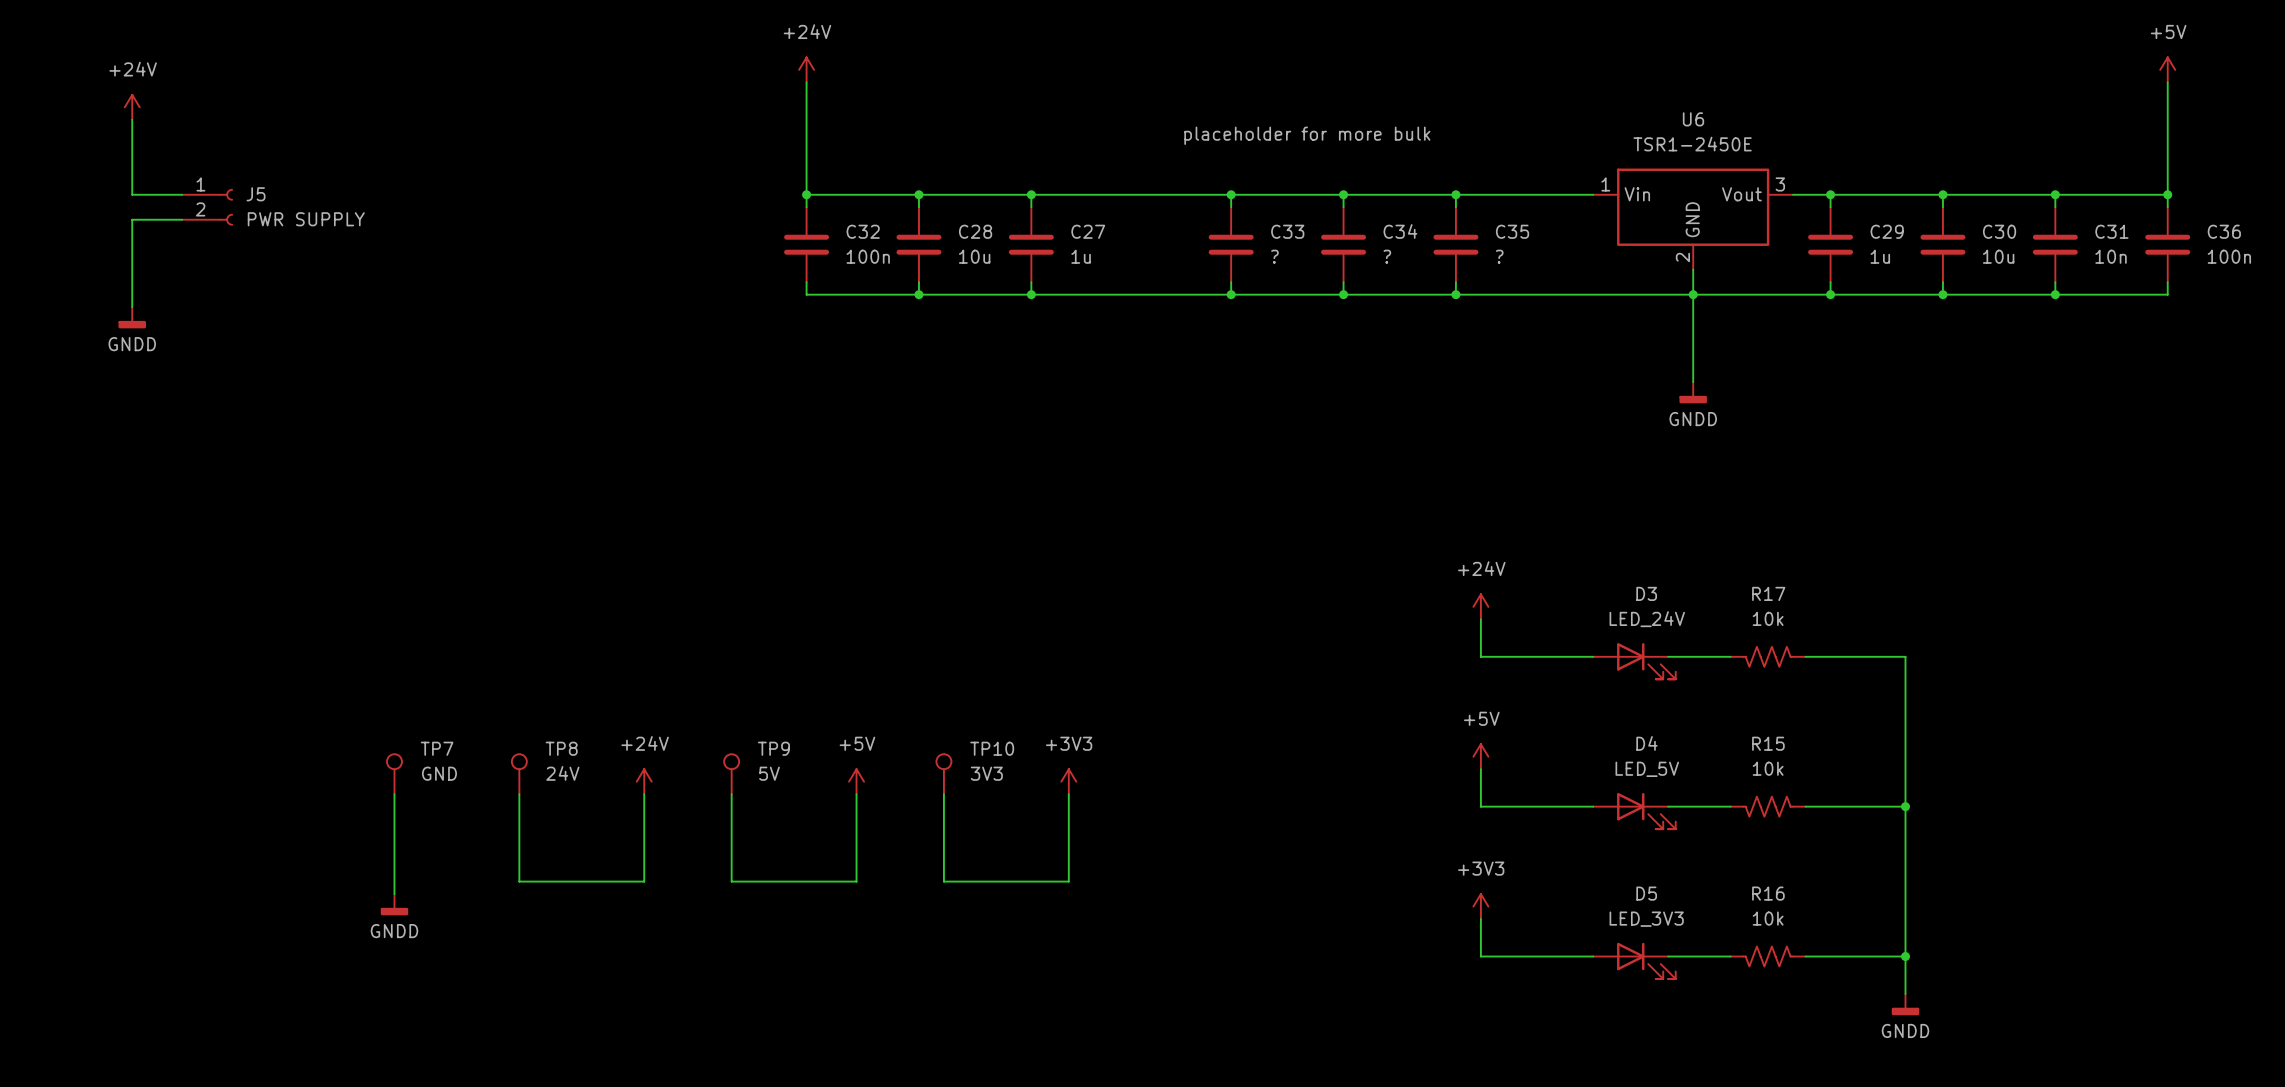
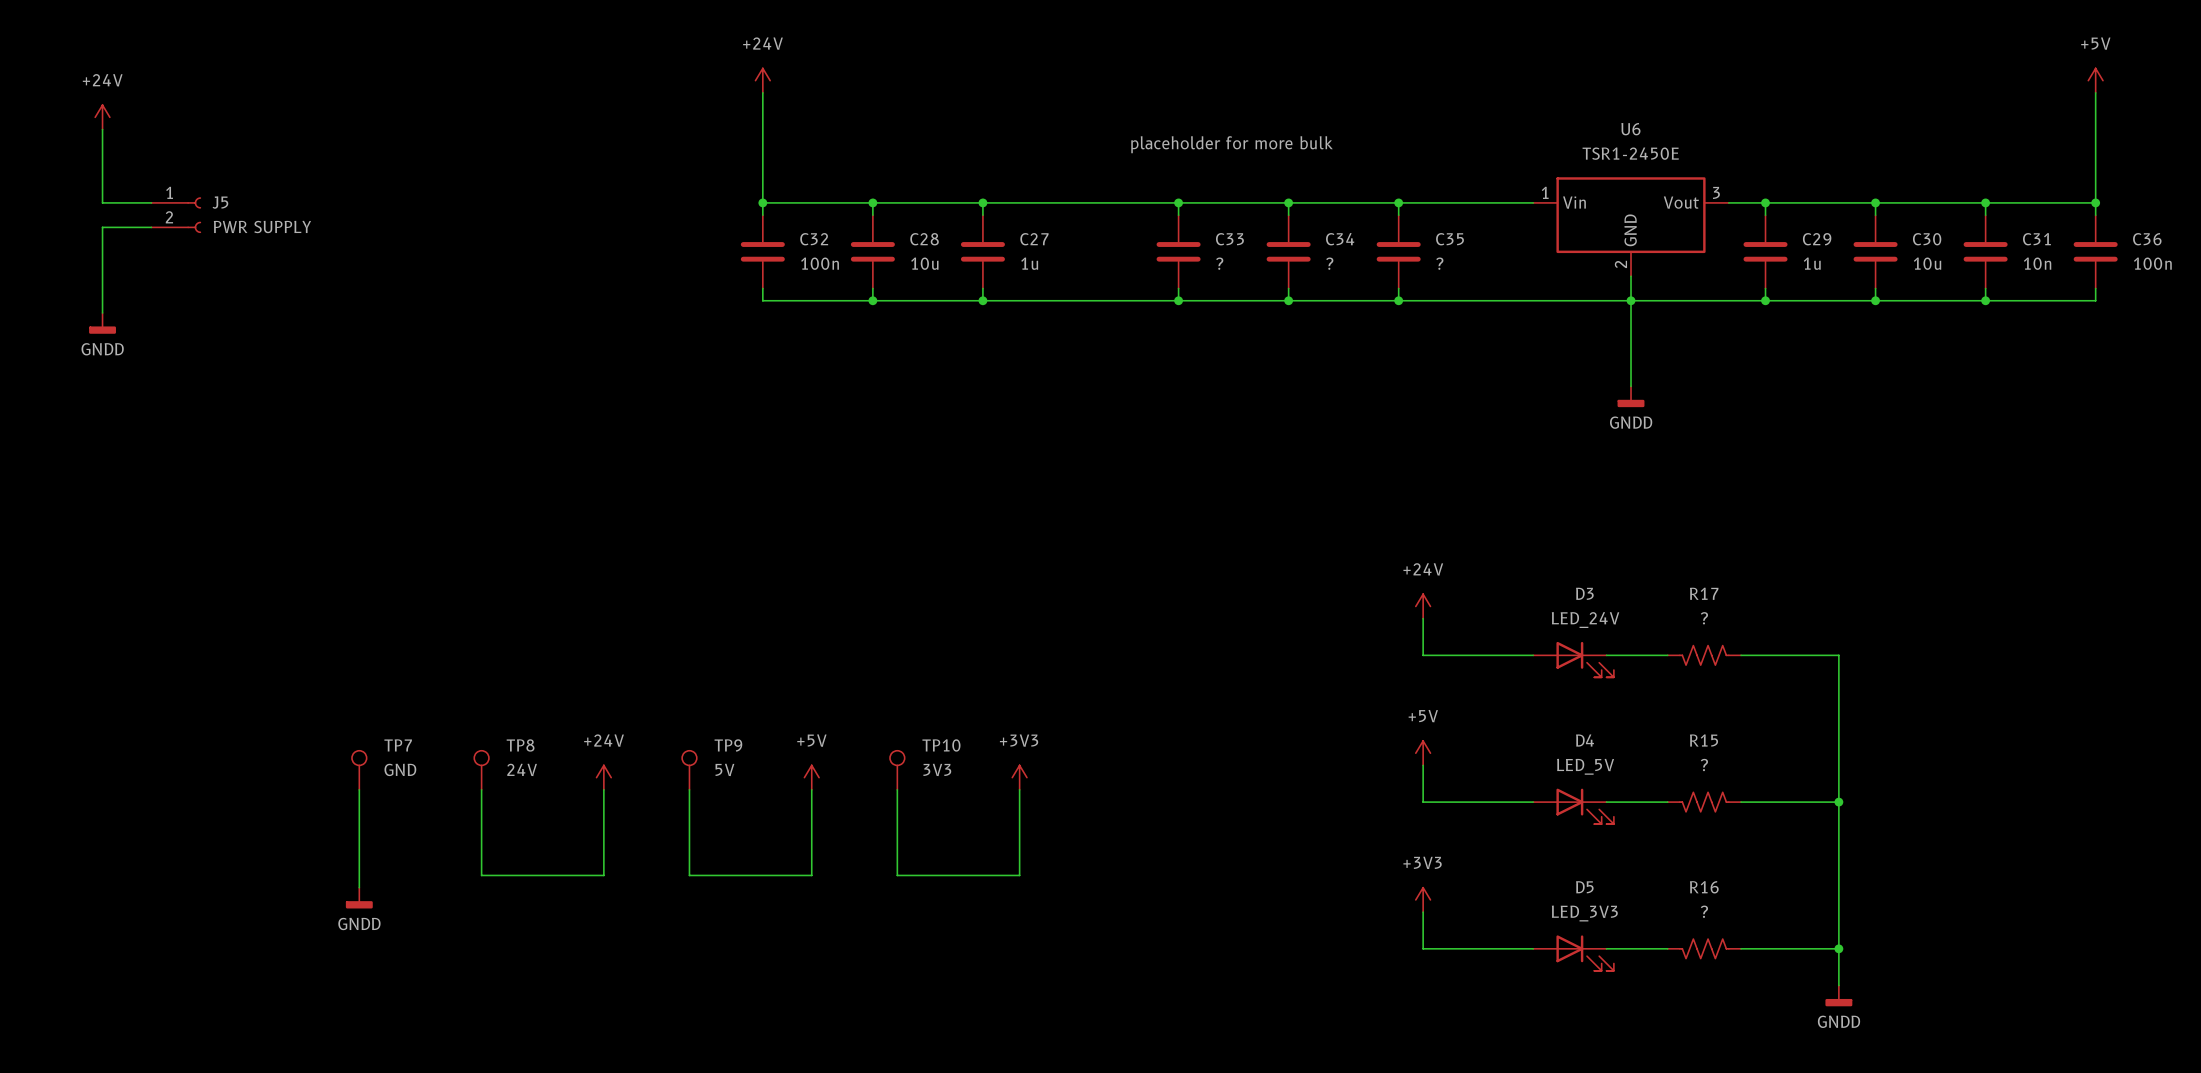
R17 value: 10k (1768, 618) -> ? (1704, 618)
R15 value: 10k (1768, 768) -> ? (1704, 765)
R16 value: 10k (1768, 918) -> ? (1704, 911)

